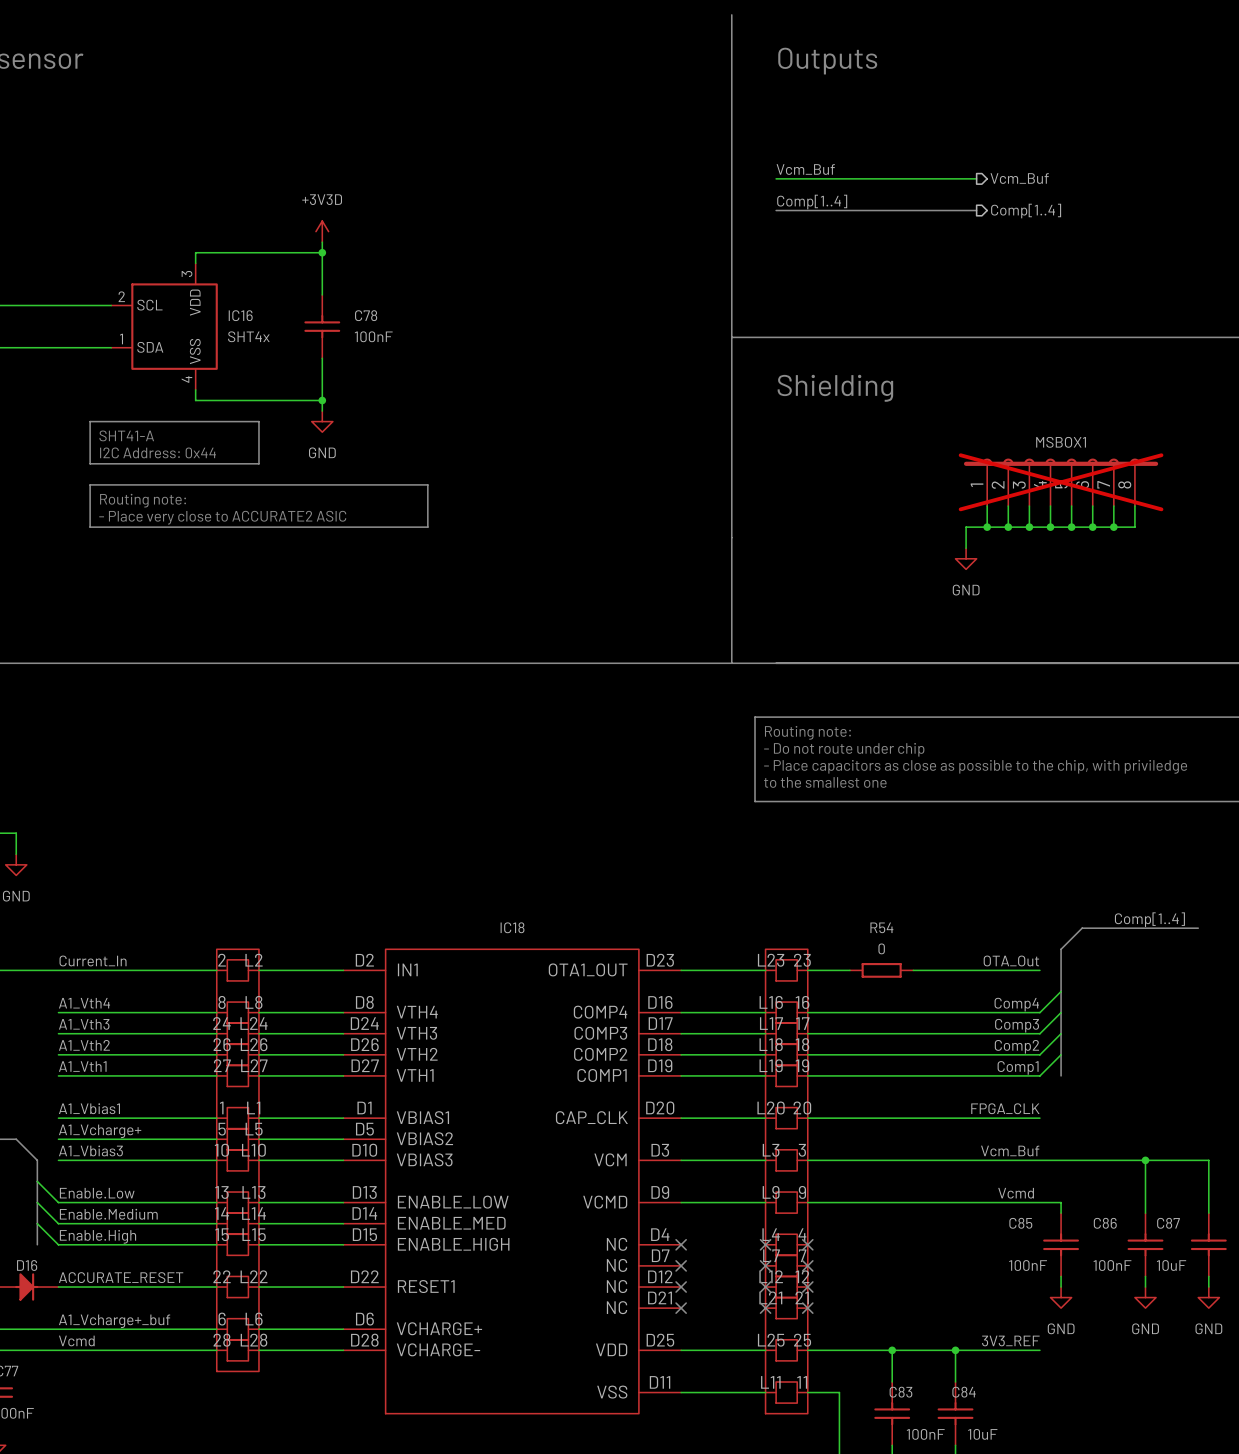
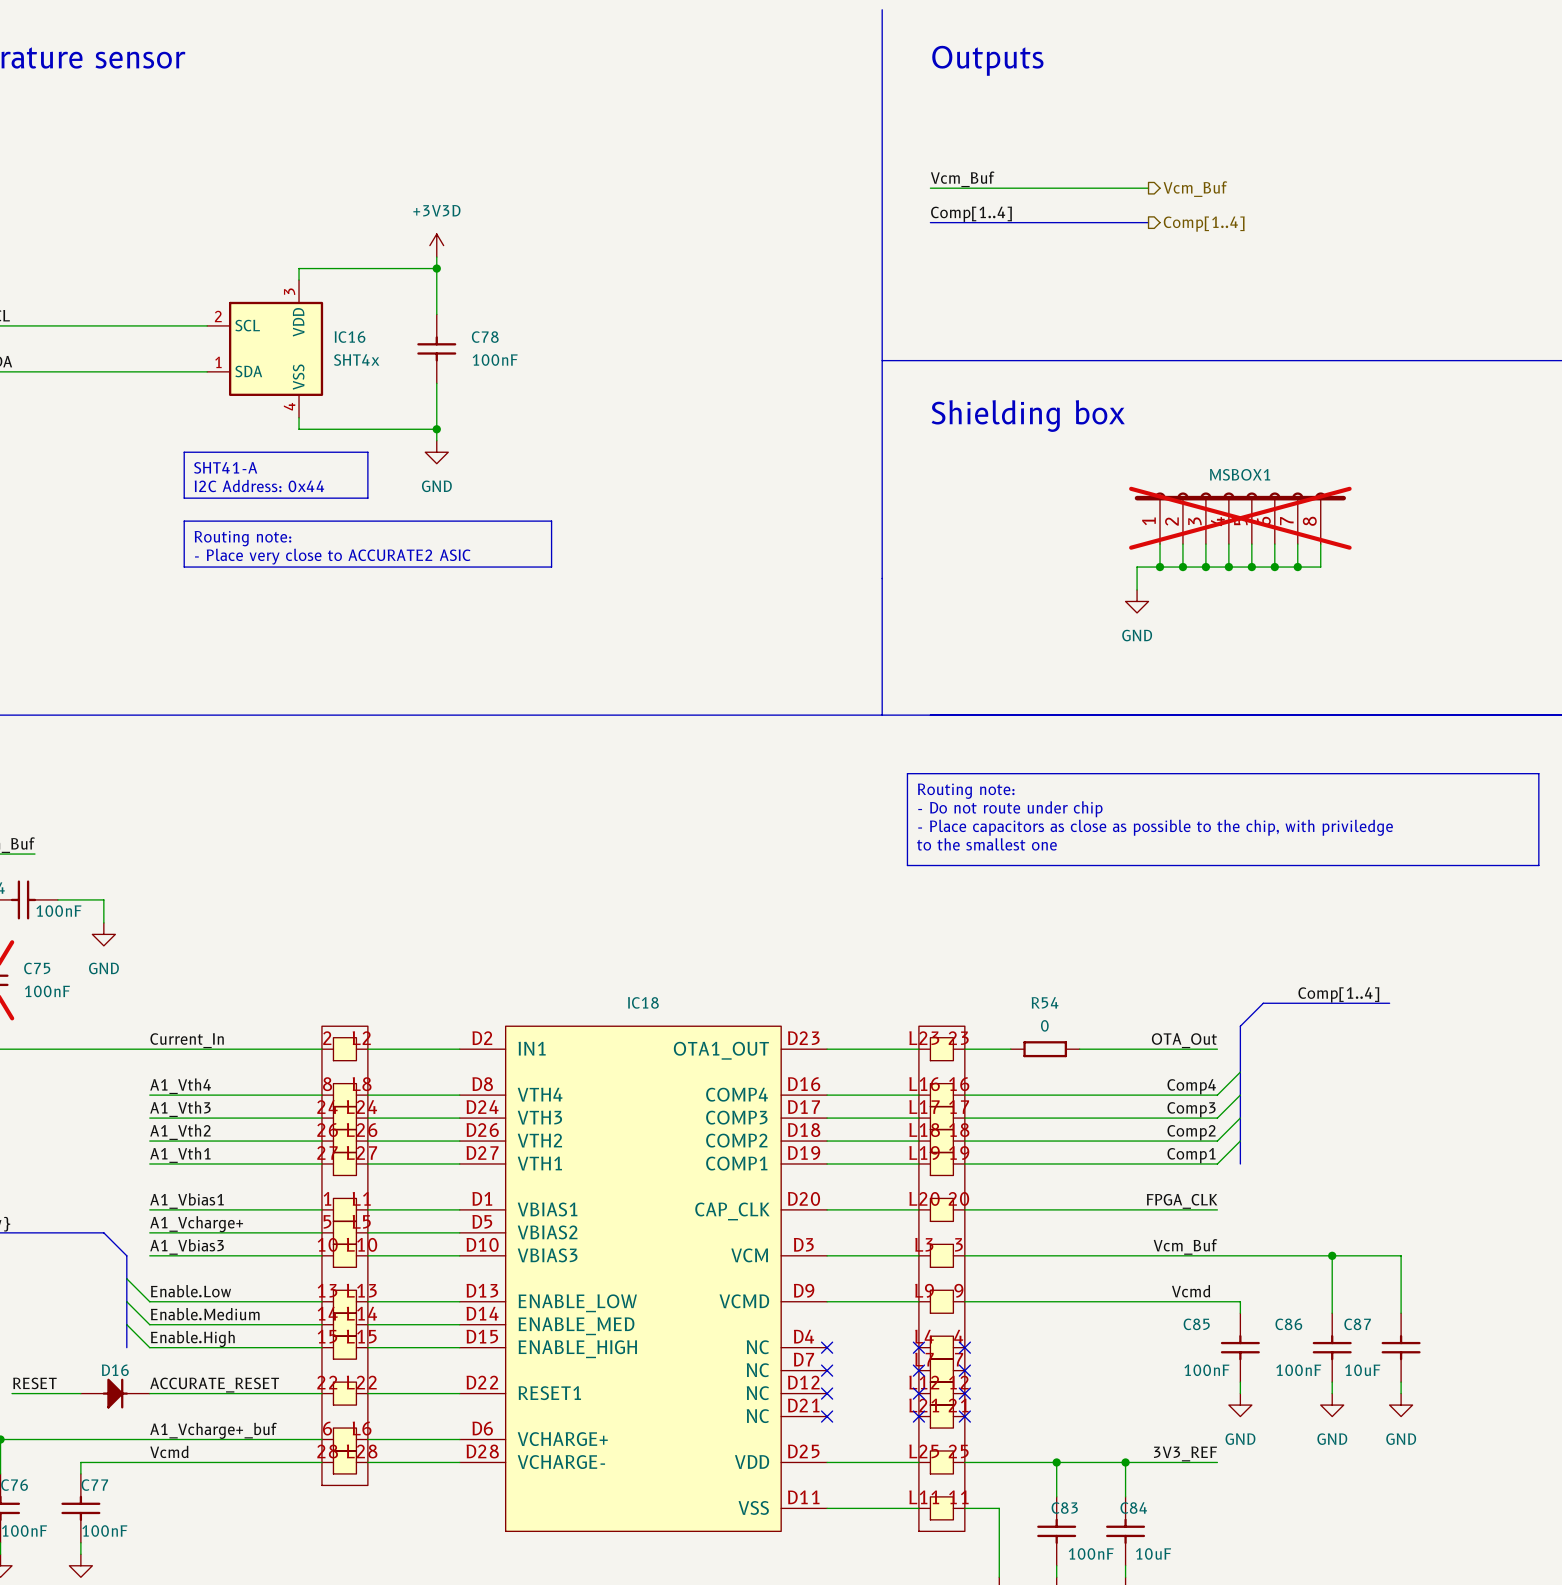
text: Shielding (835, 388) -> Shielding box (1028, 416)

